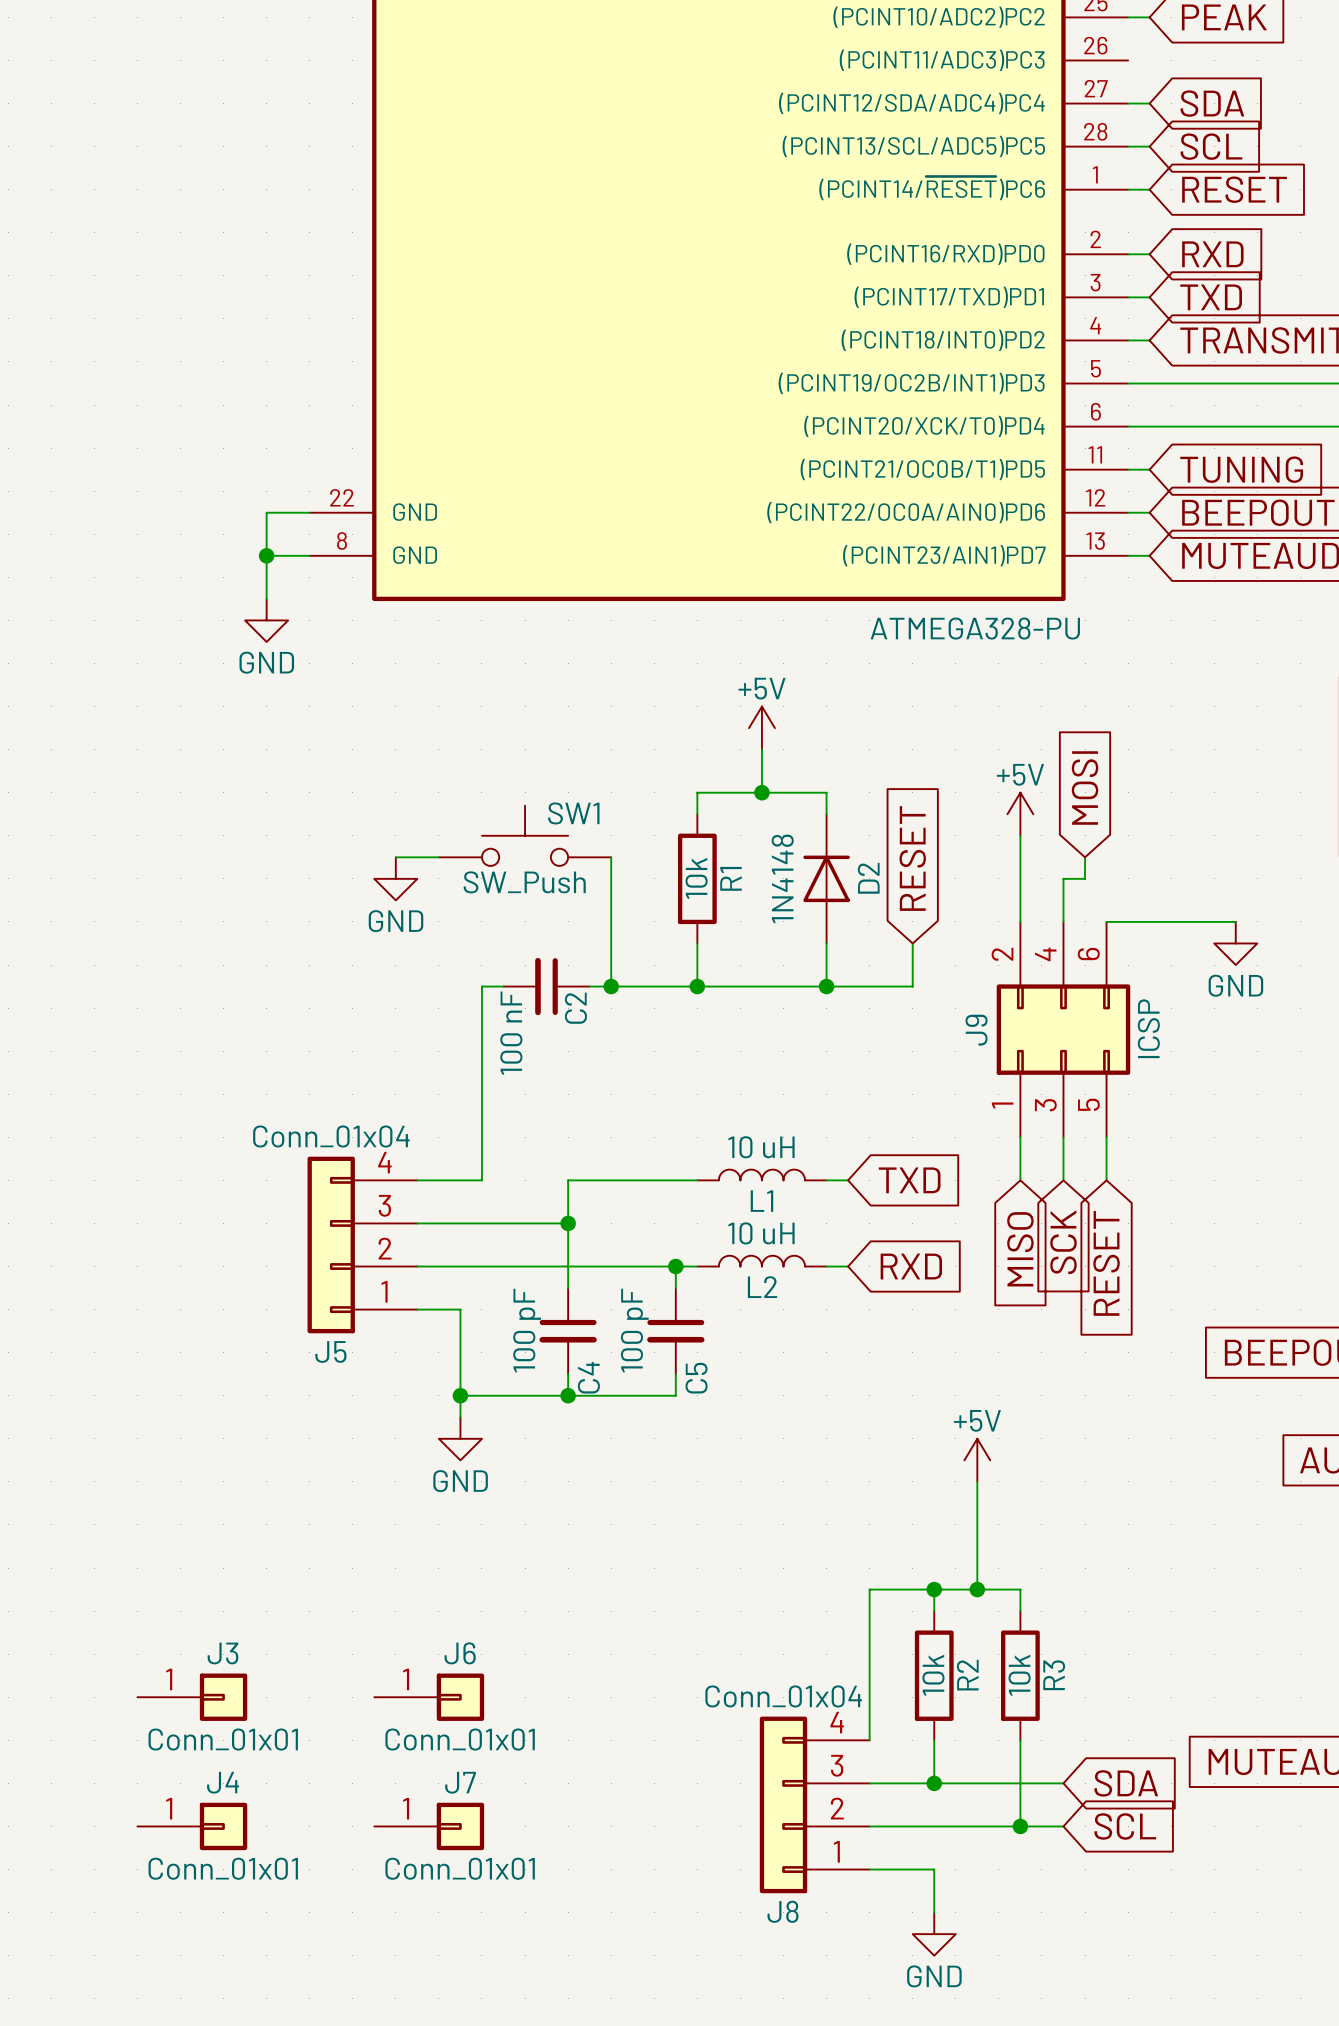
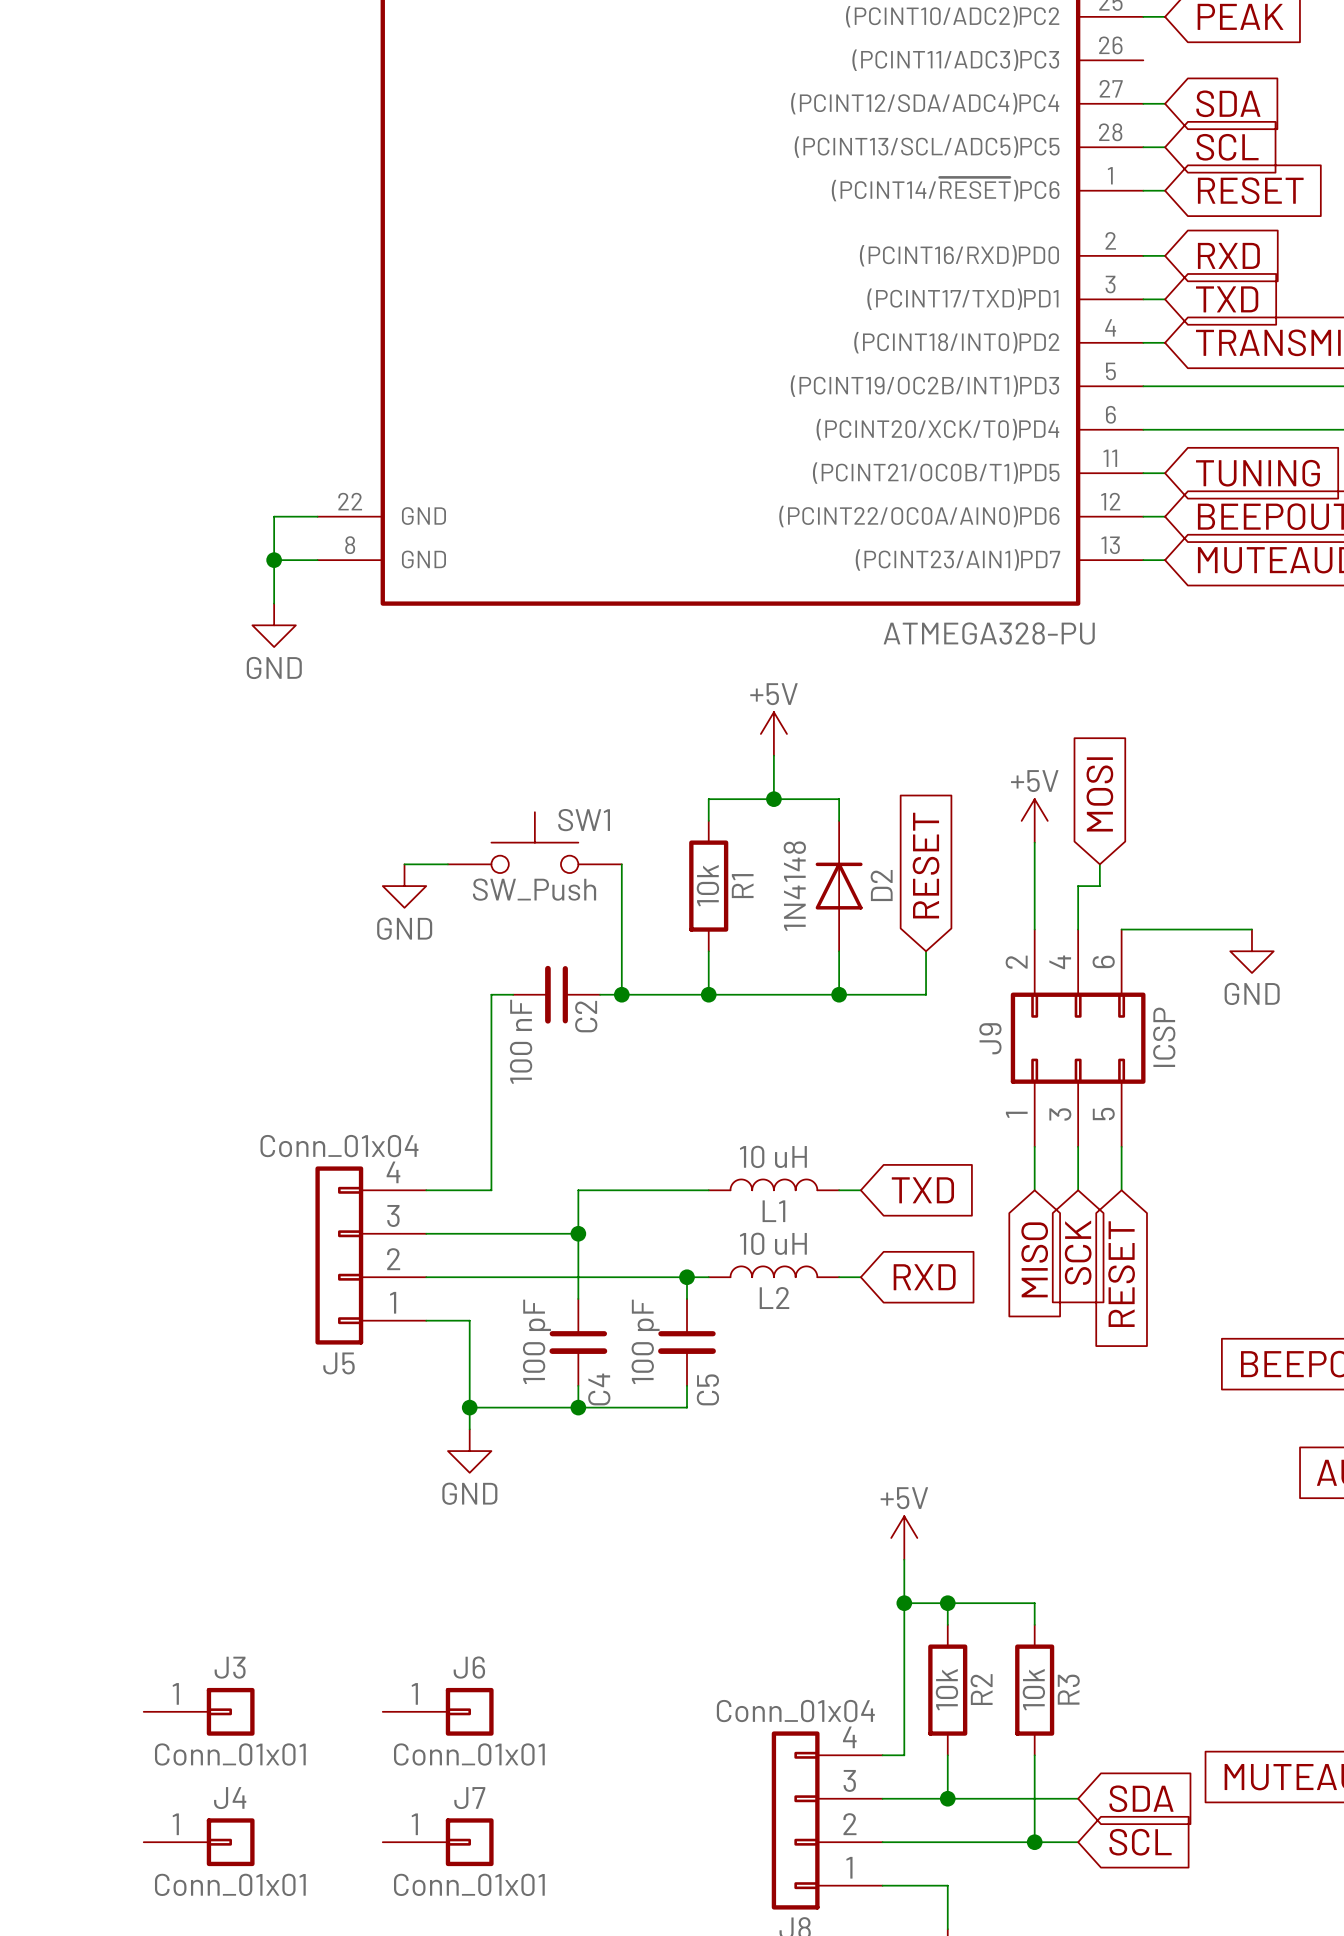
power symbol position: +5V (977, 1460) -> +5V (904, 1537)
wire: (977, 1481) (977, 1589) -> none
wire: (891, 1589) (869, 1589) (869, 1740) -> (904, 1559) (904, 1755) (882, 1755)
junction position: (977, 1589) -> (904, 1603)

